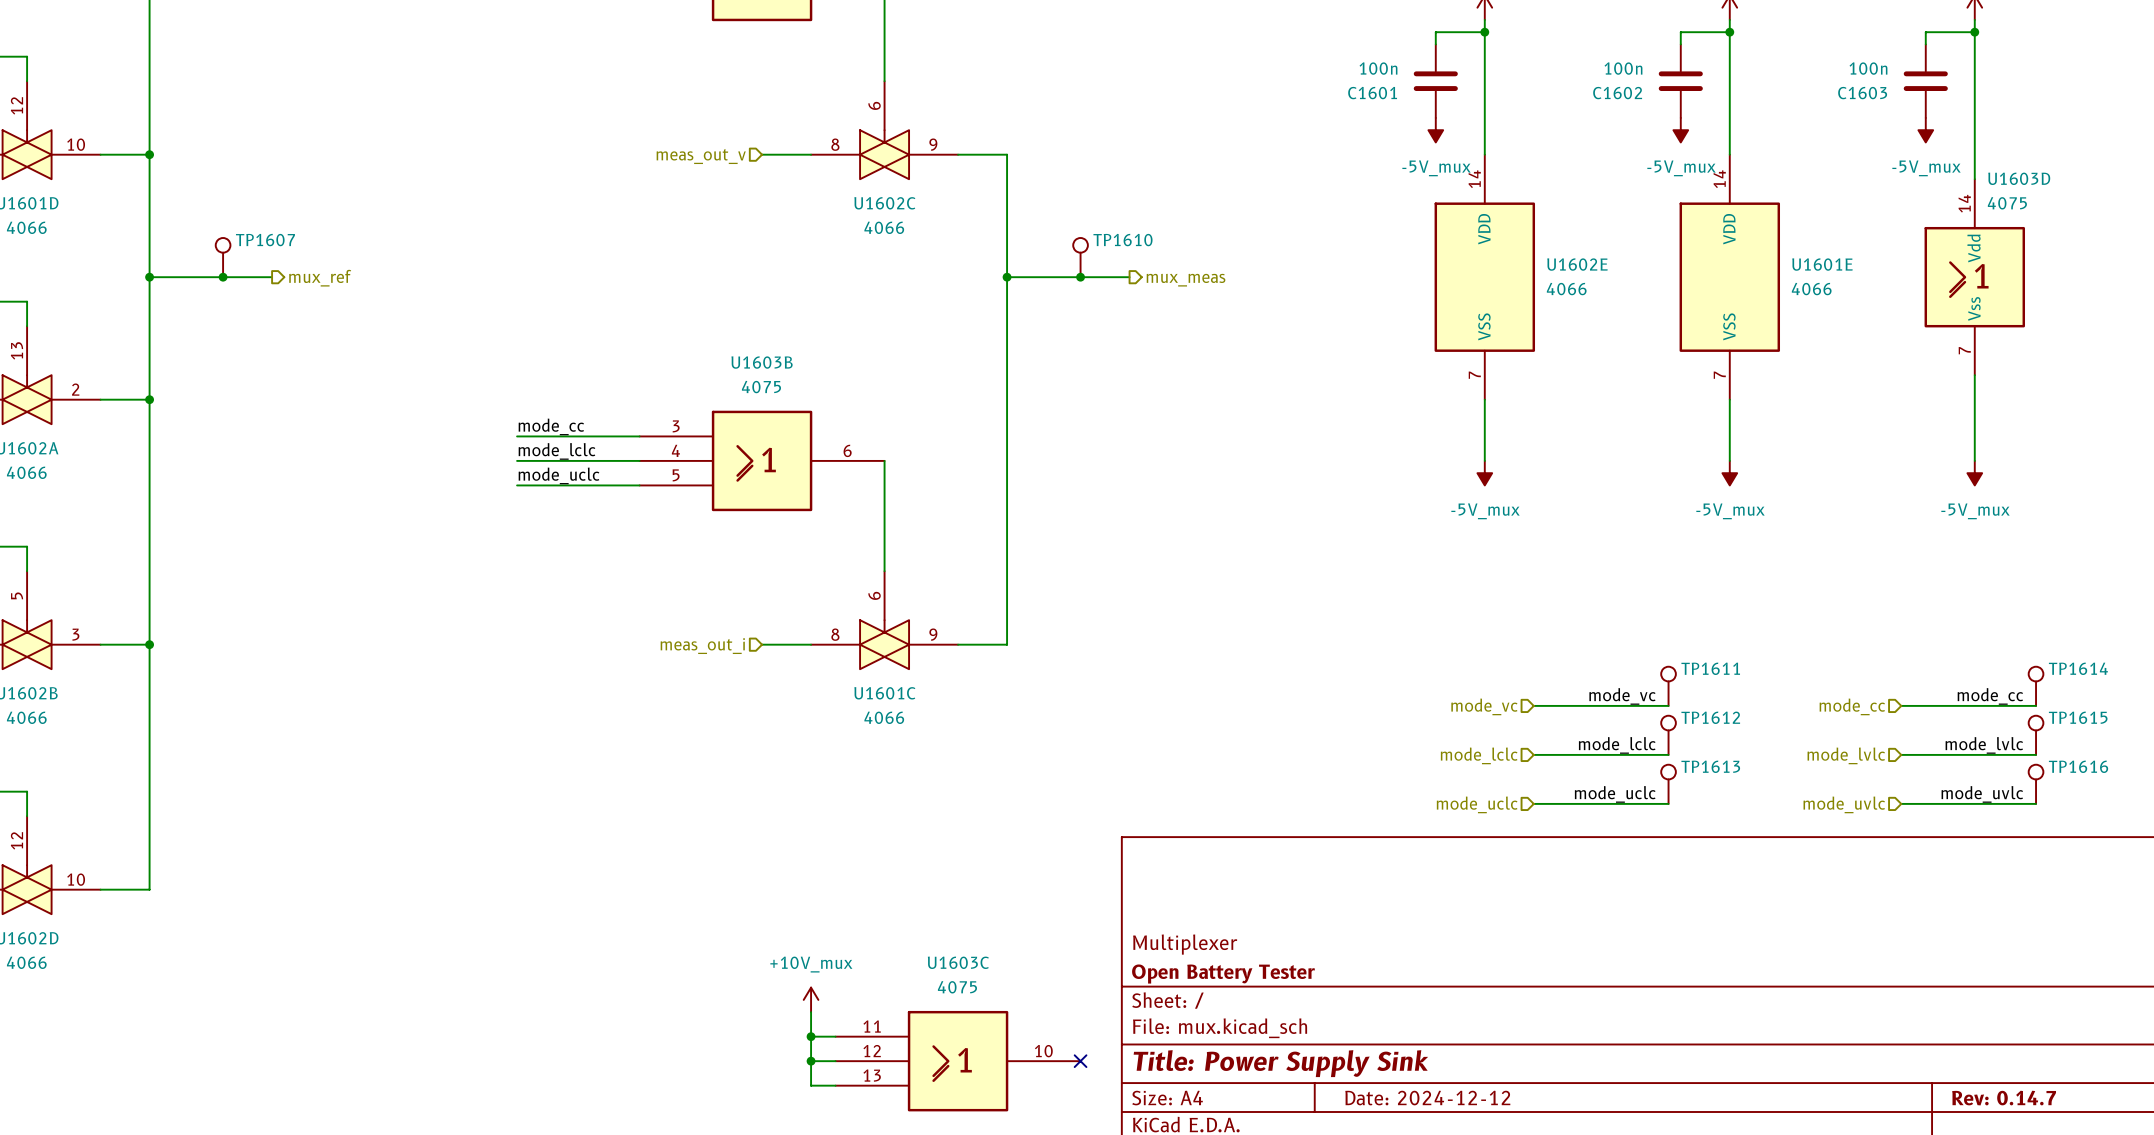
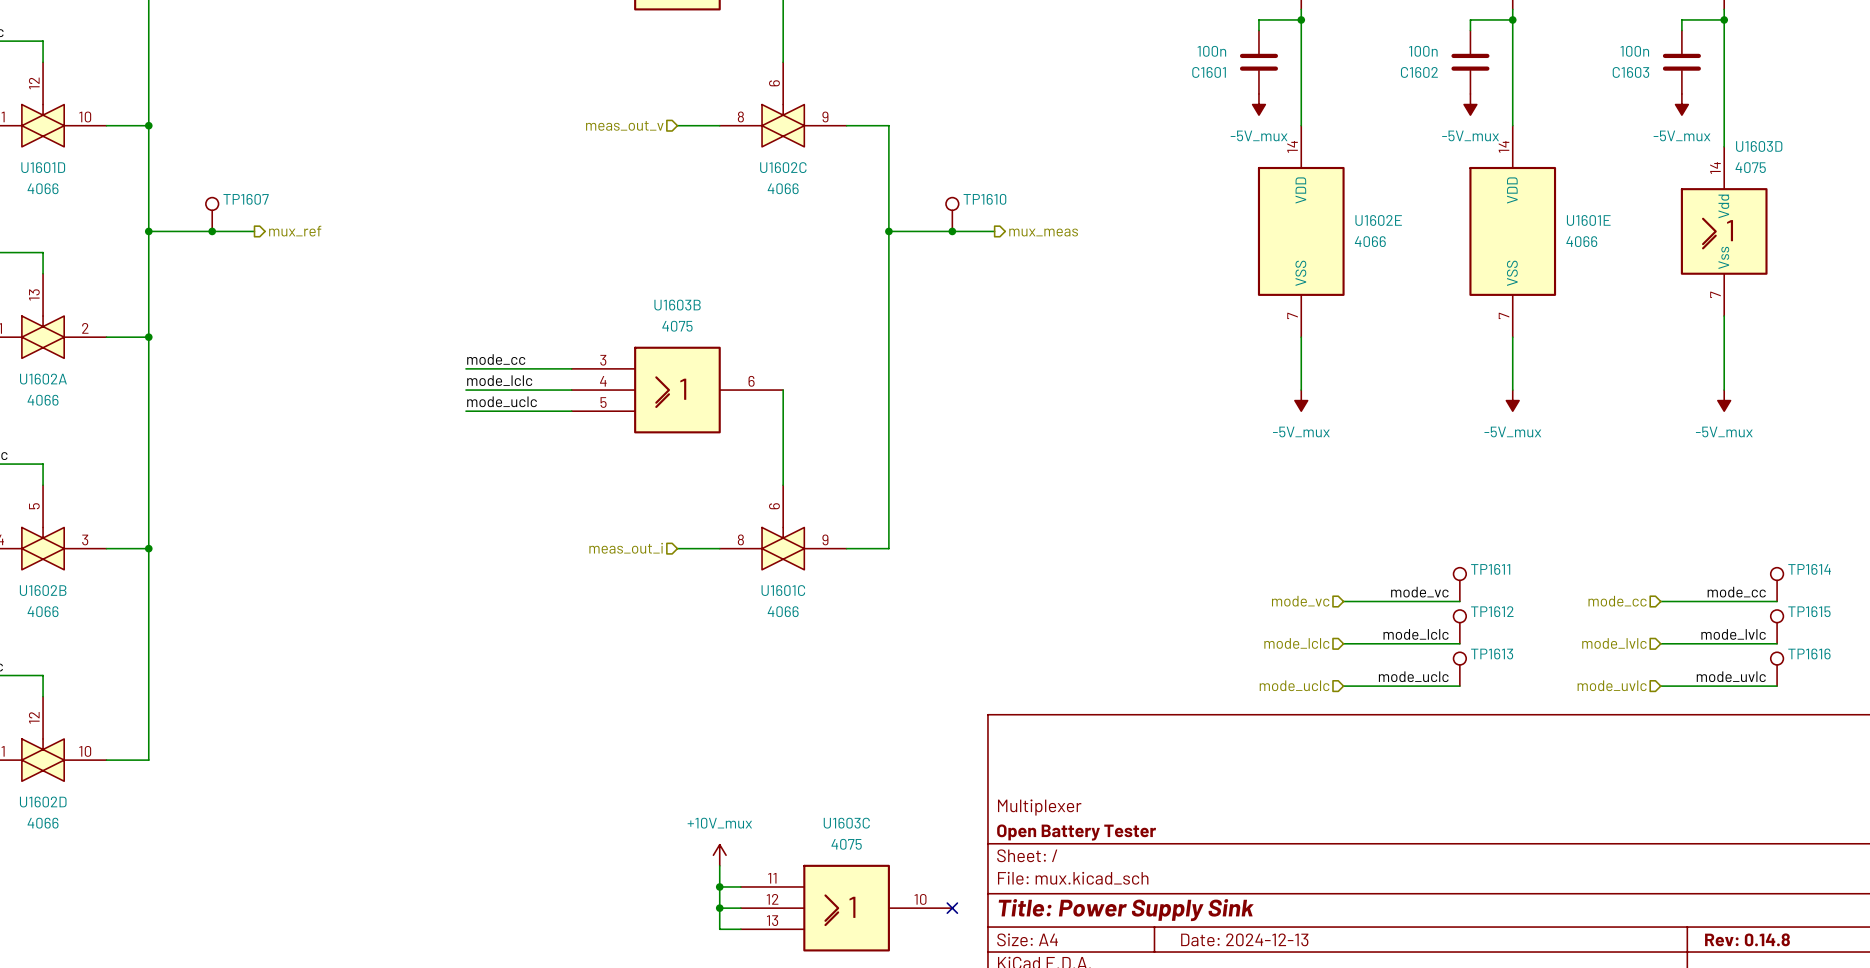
title block: Date: 2024-12-12 (1427, 1098) -> Date: 2024-12-13 (1244, 939)
title block: Rev: 0.14.7 (2004, 1098) -> Rev: 0.14.8 (1747, 939)

